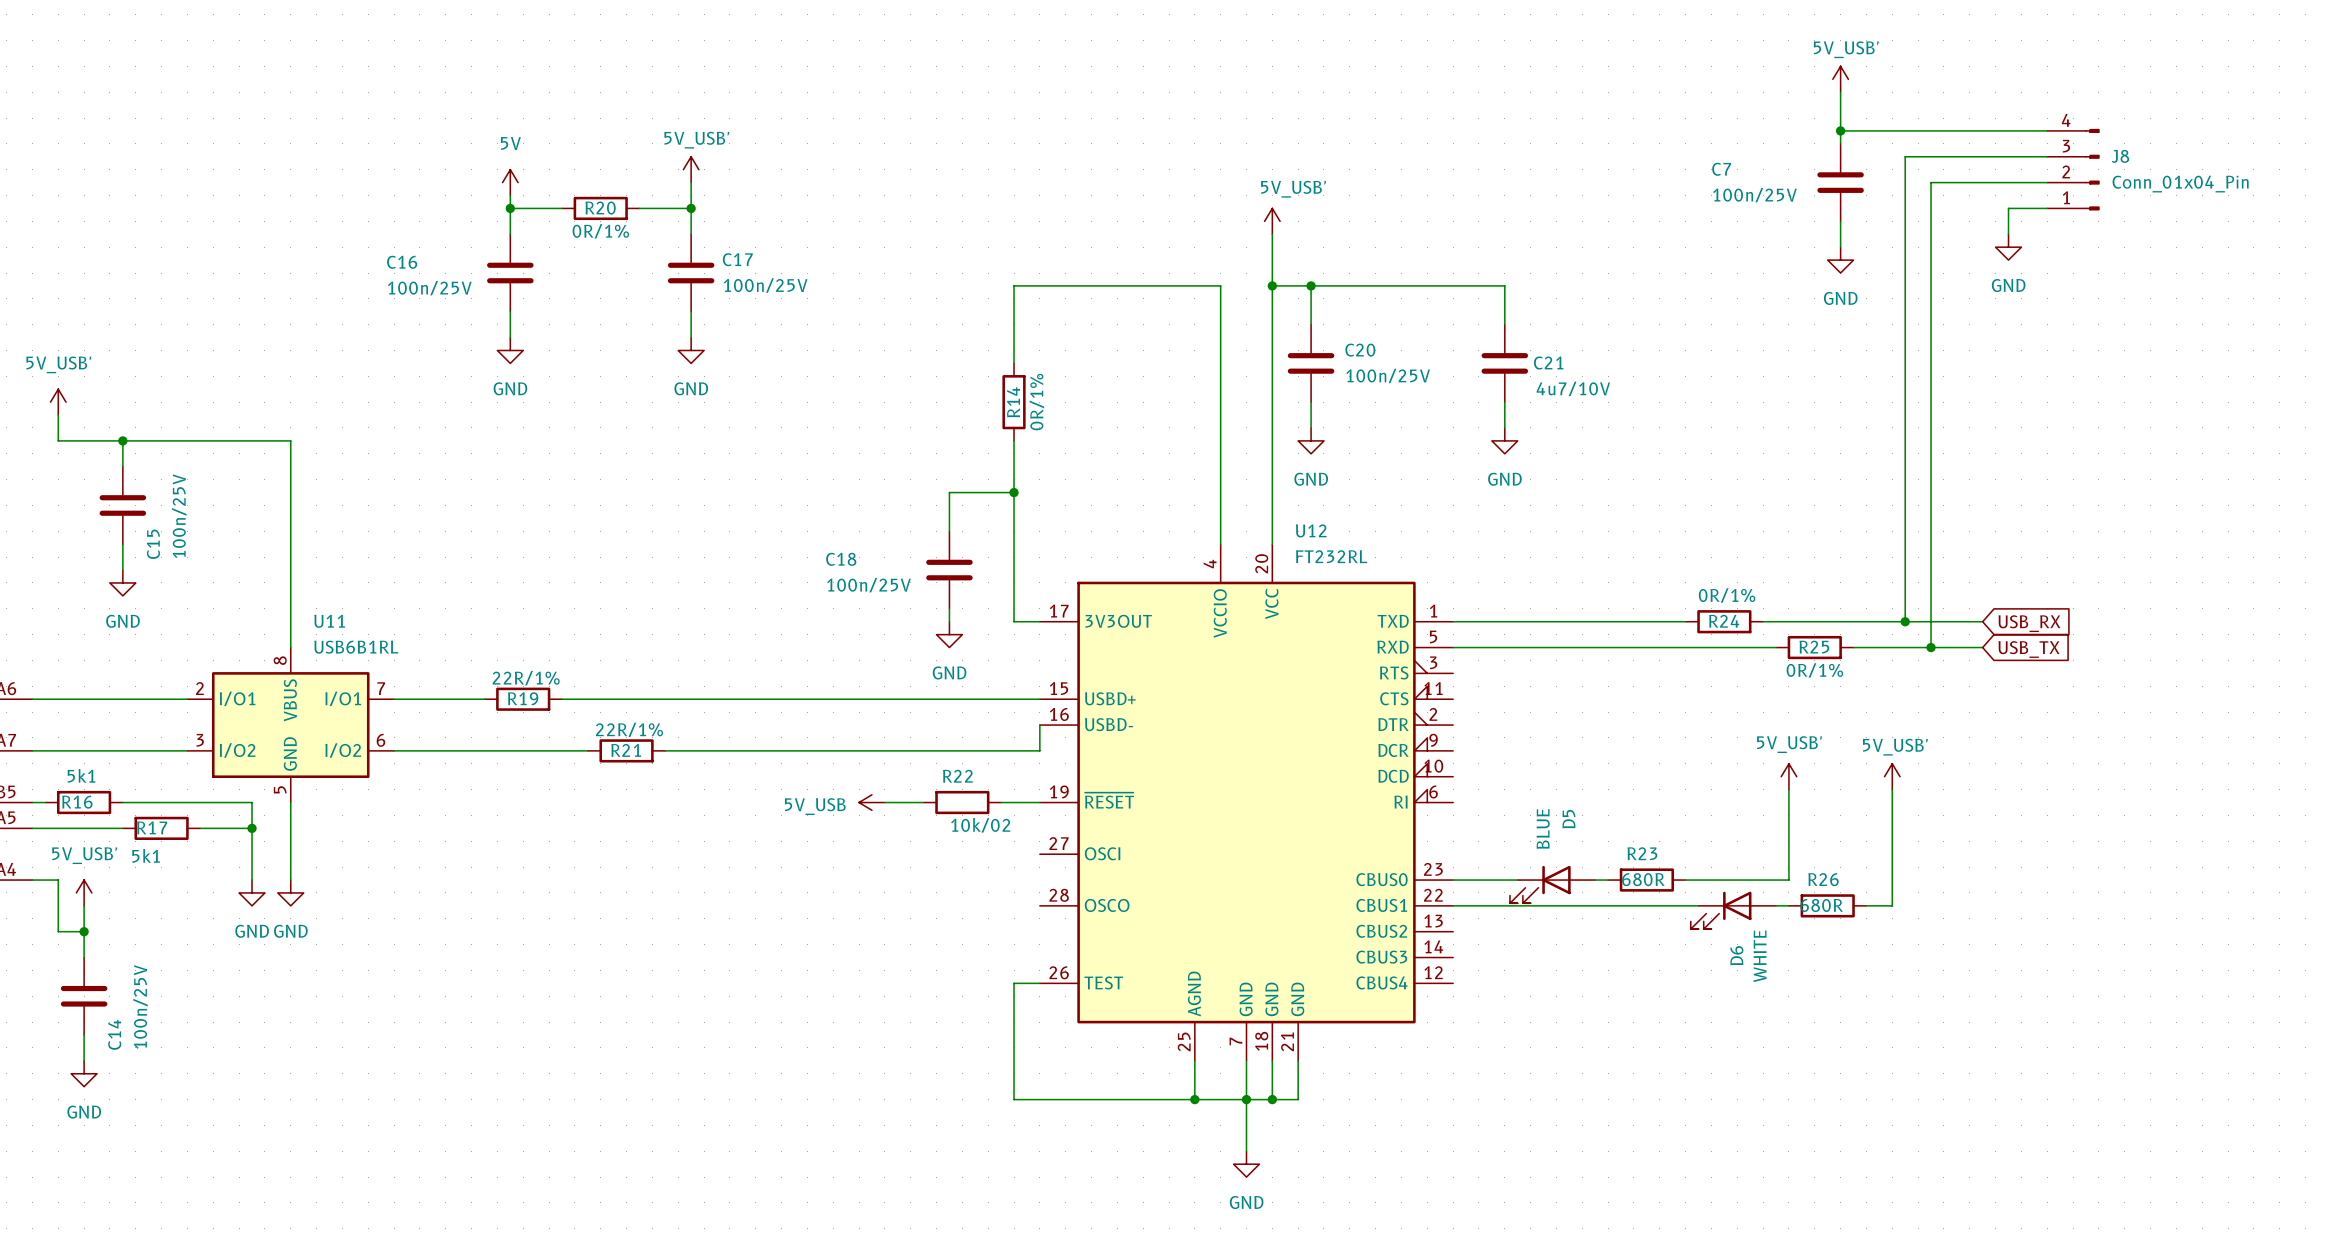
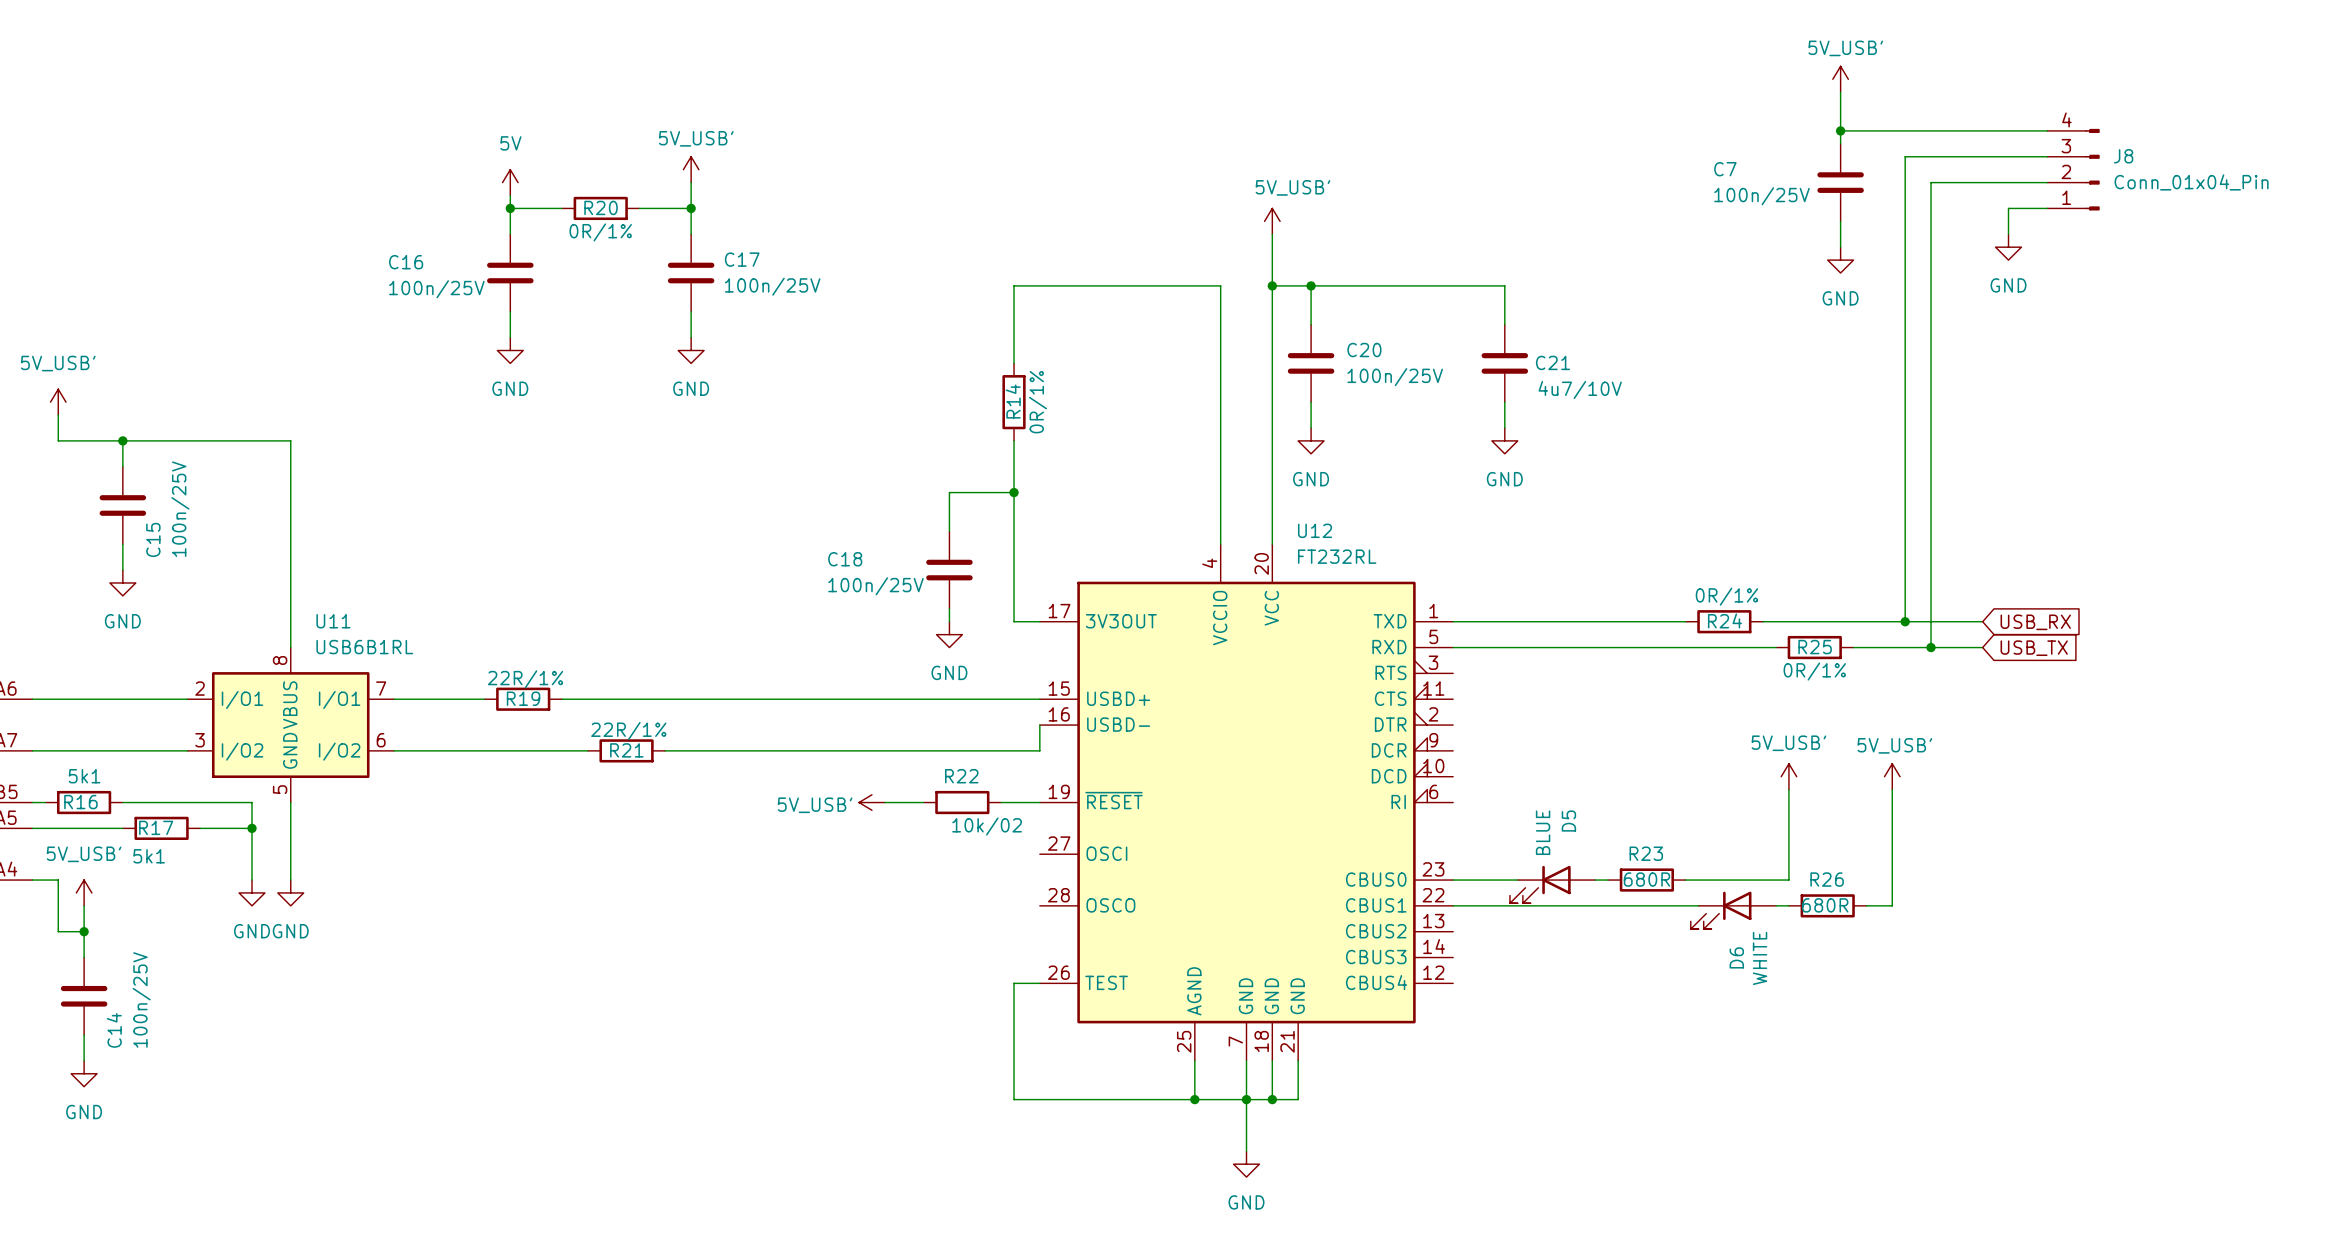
power symbol: 5V_USB (871, 802) -> 5V_USB' (871, 802)

